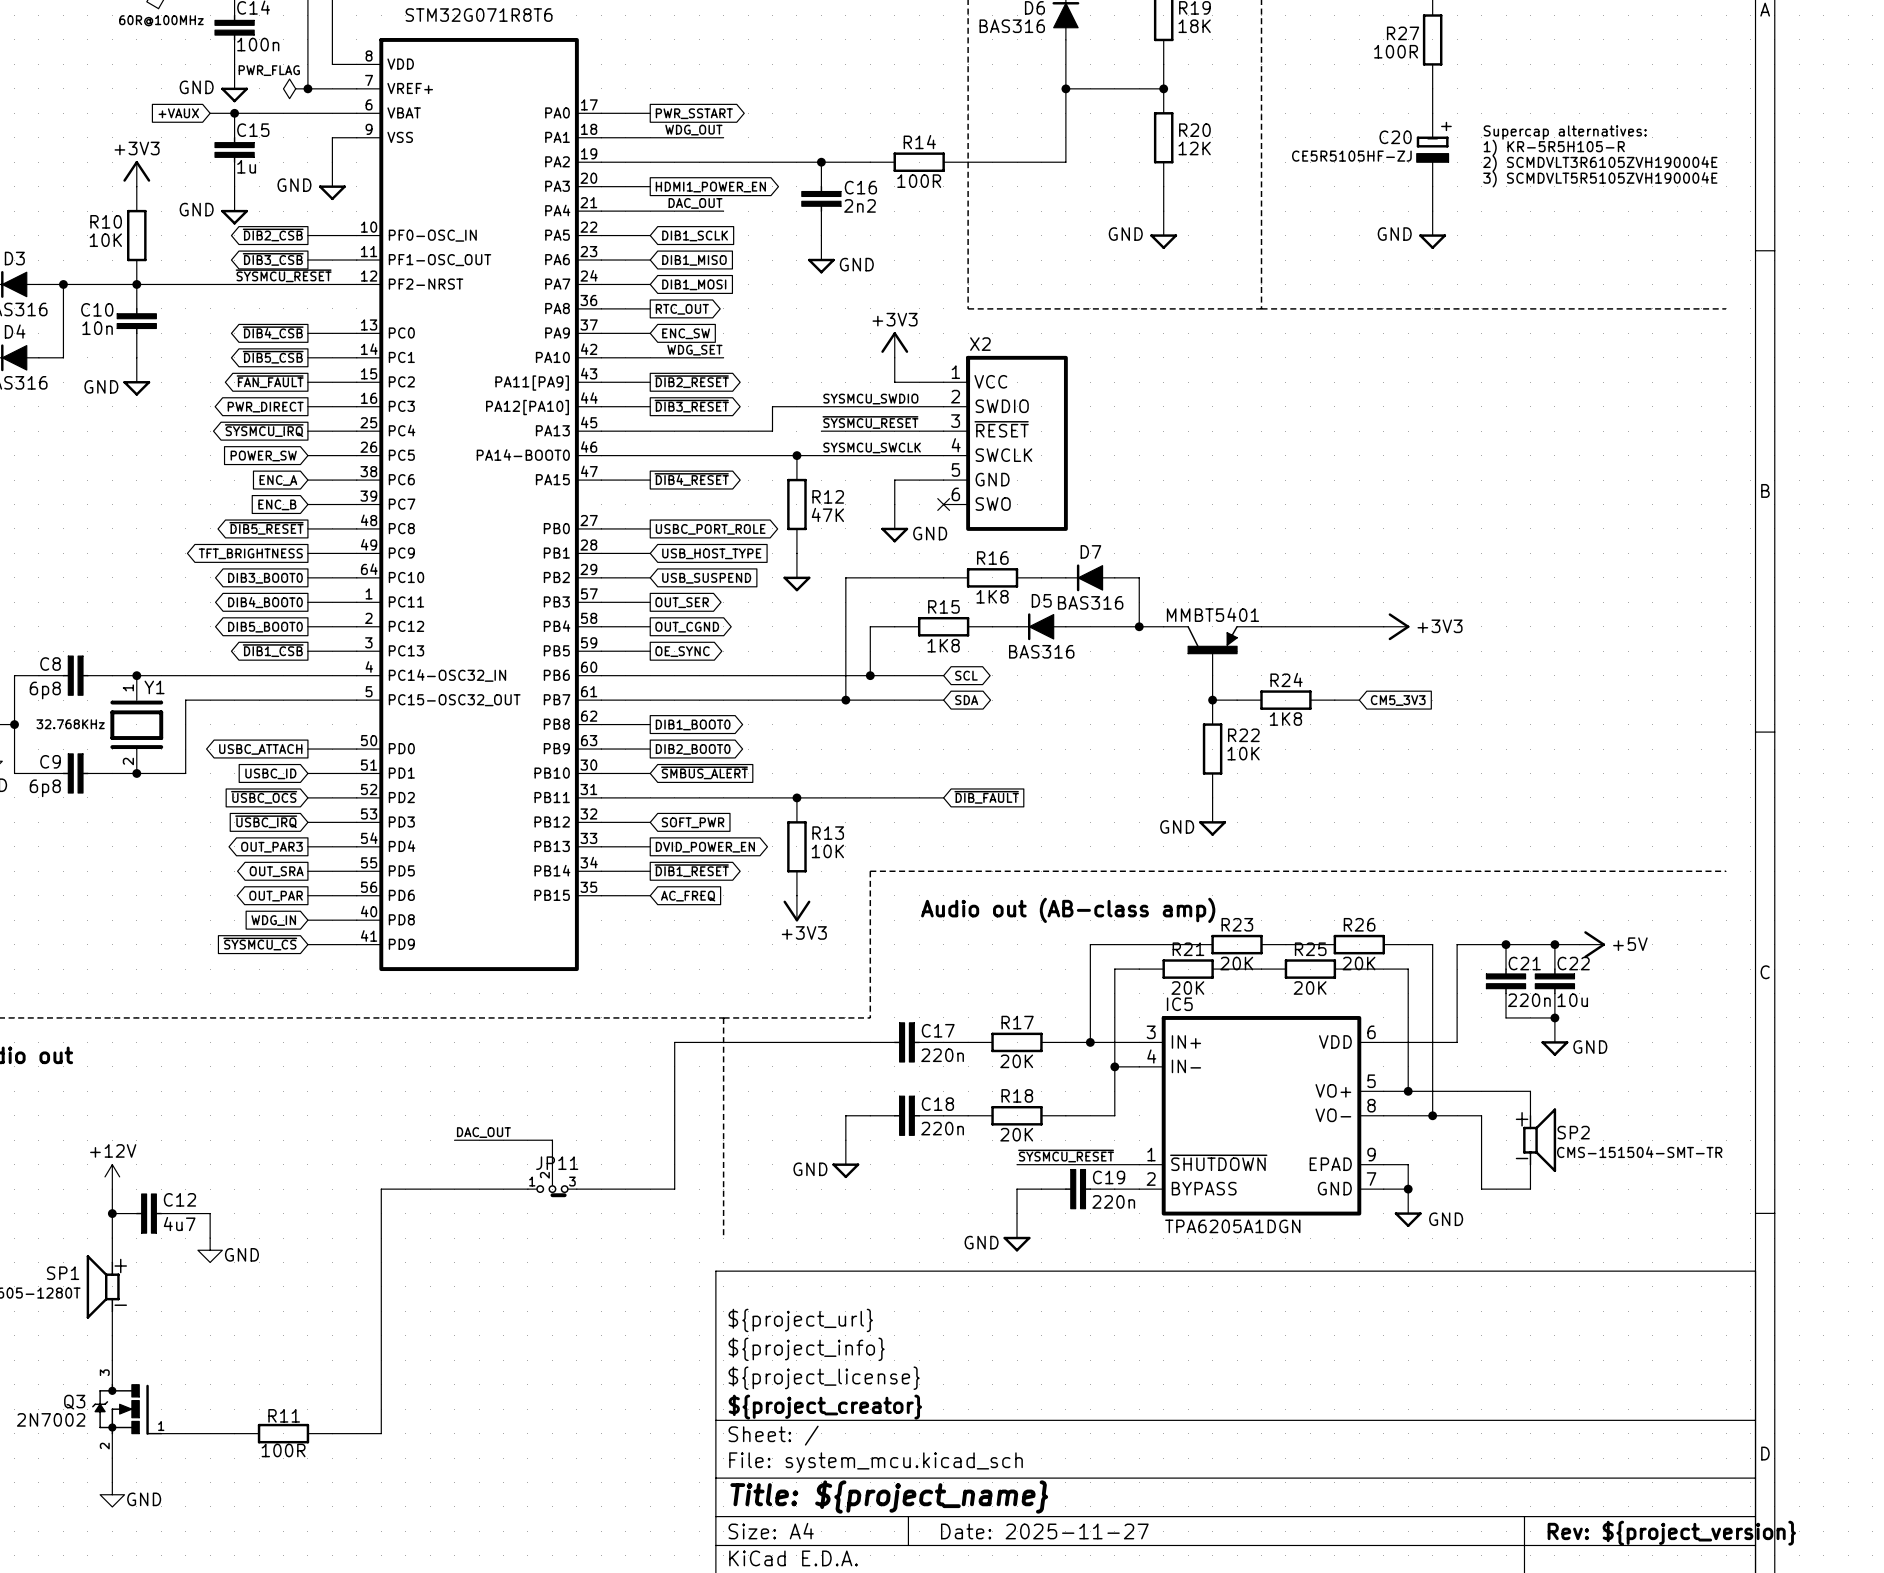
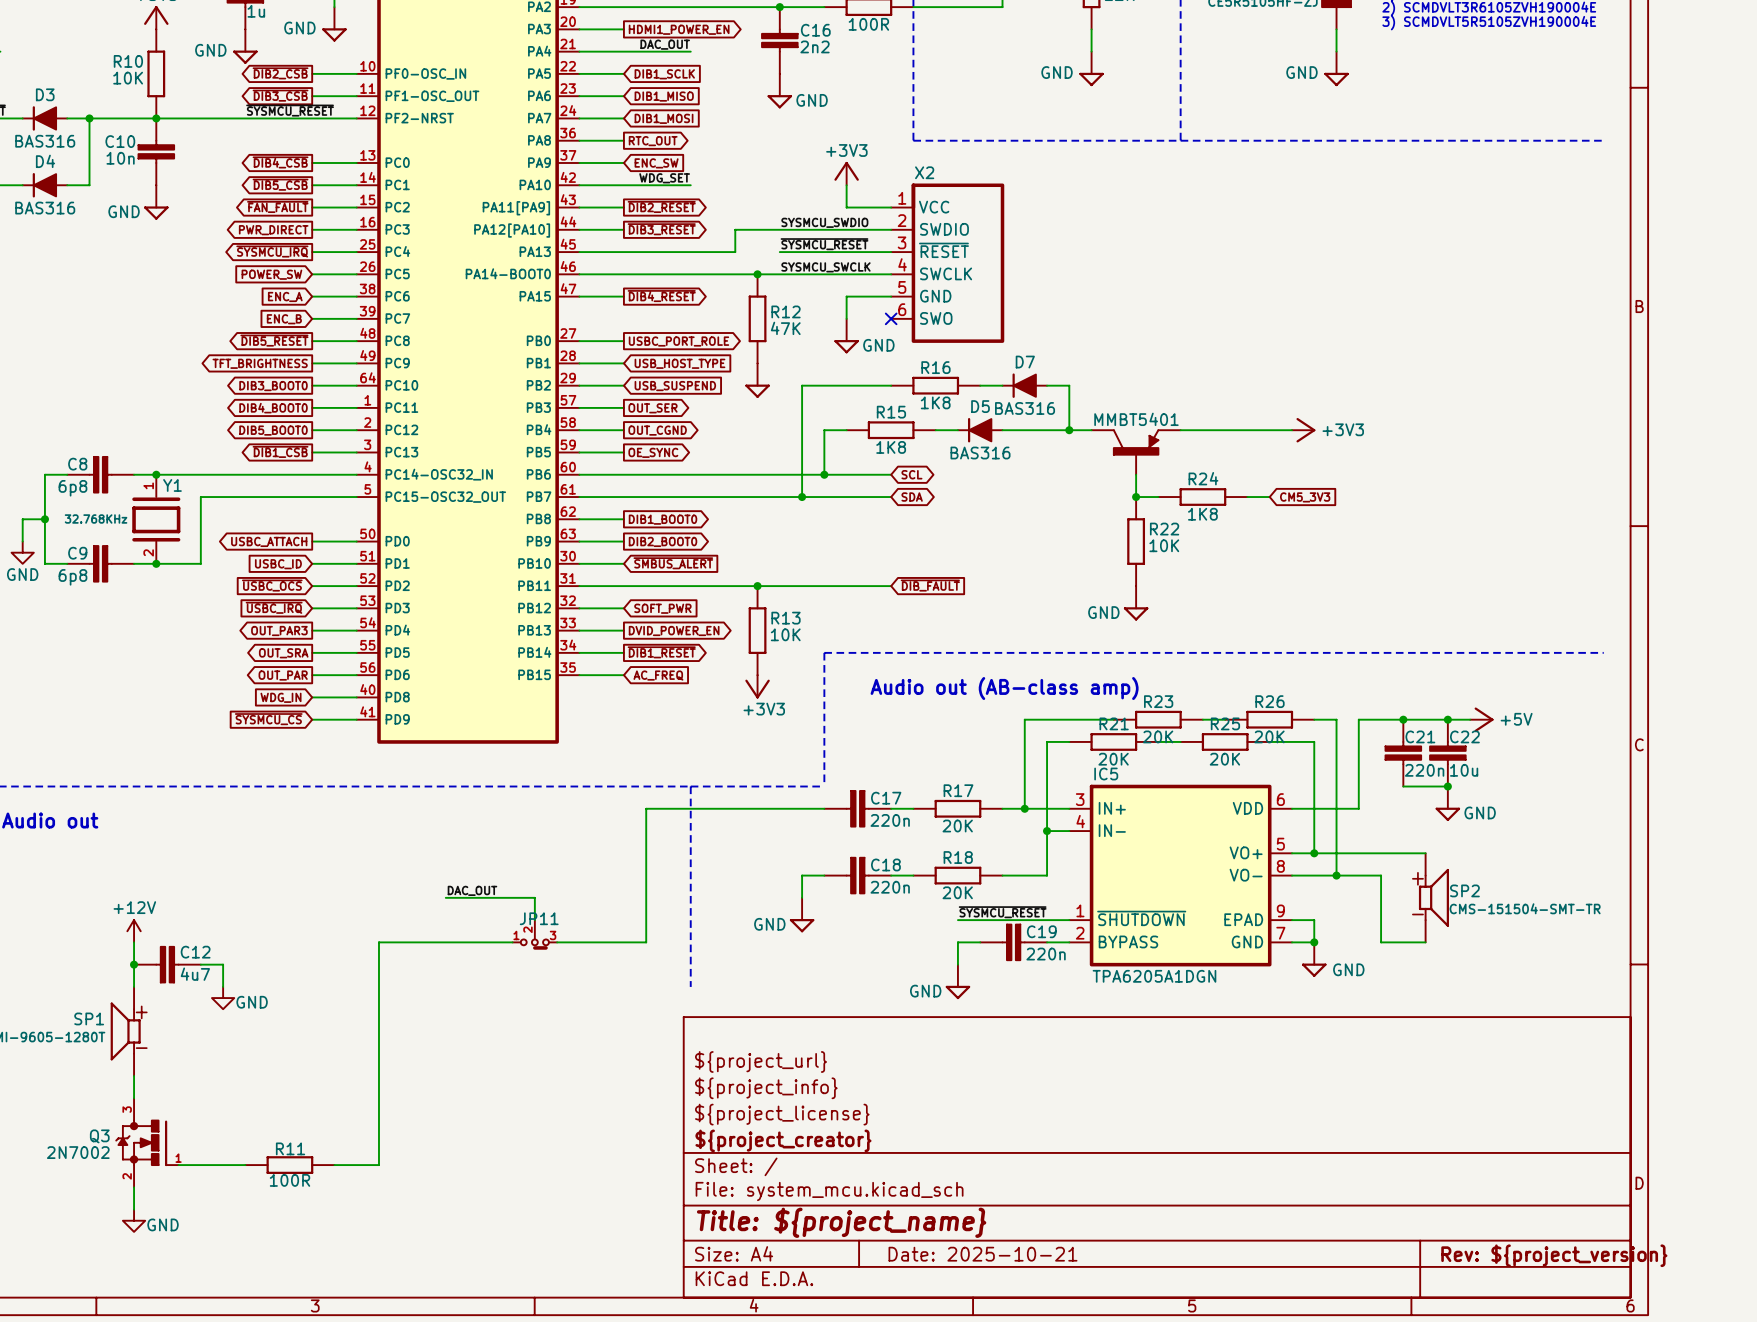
title block: Date: 2025-11-27 (1044, 1531) -> Date: 2025-10-21 (983, 1254)

